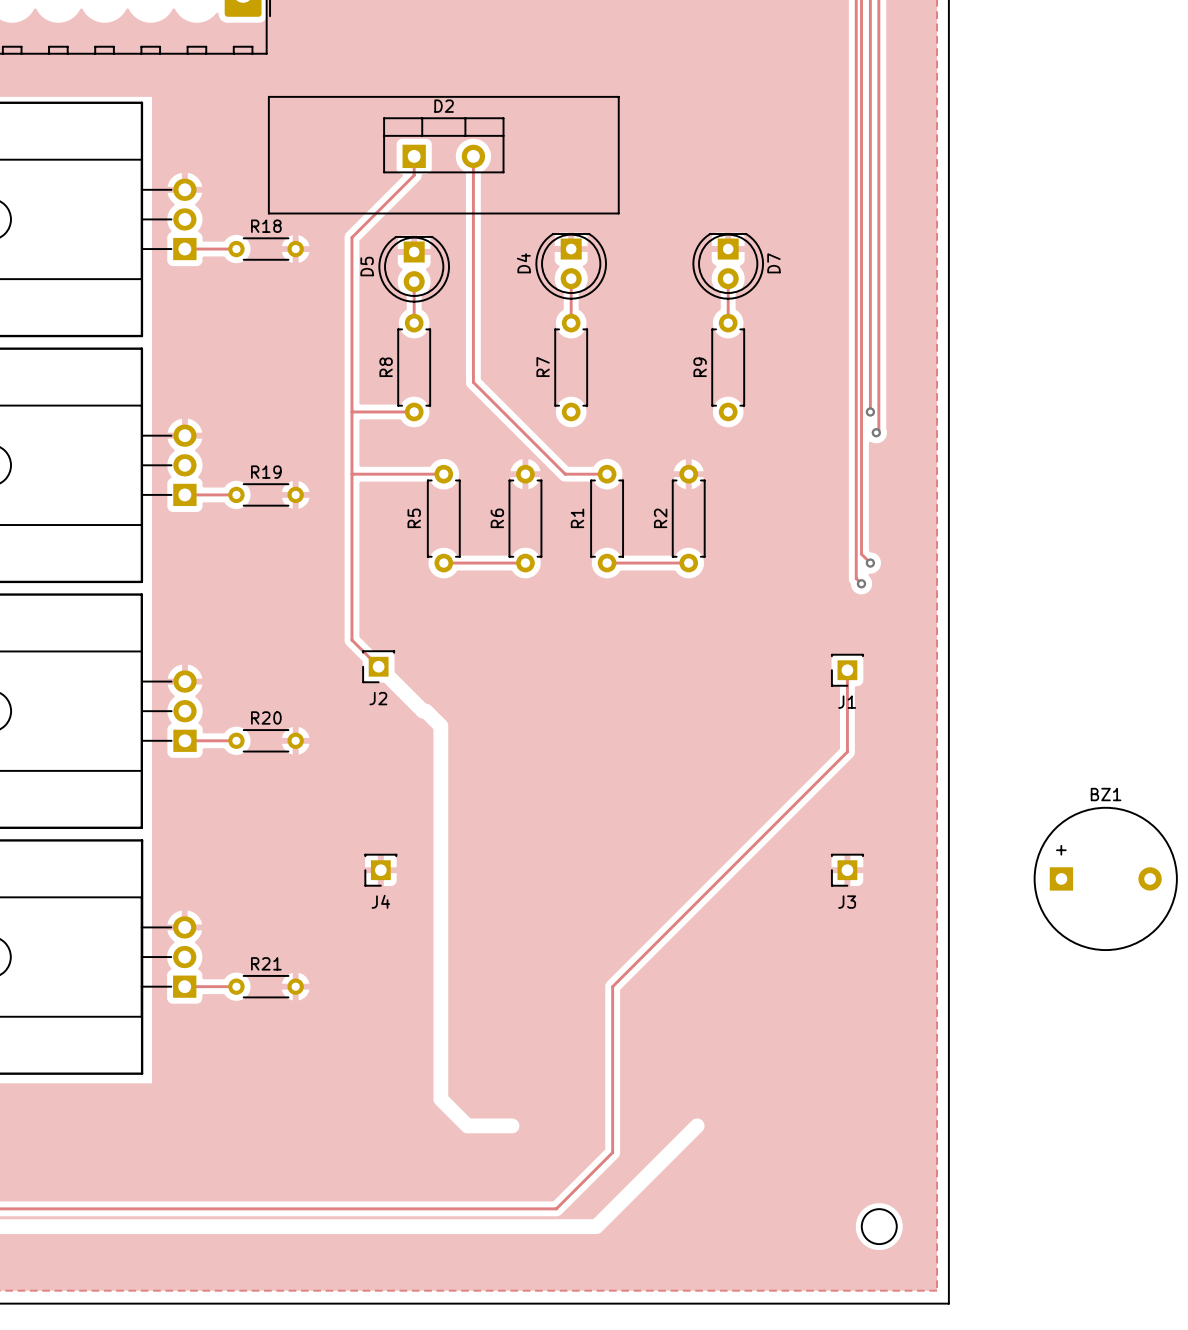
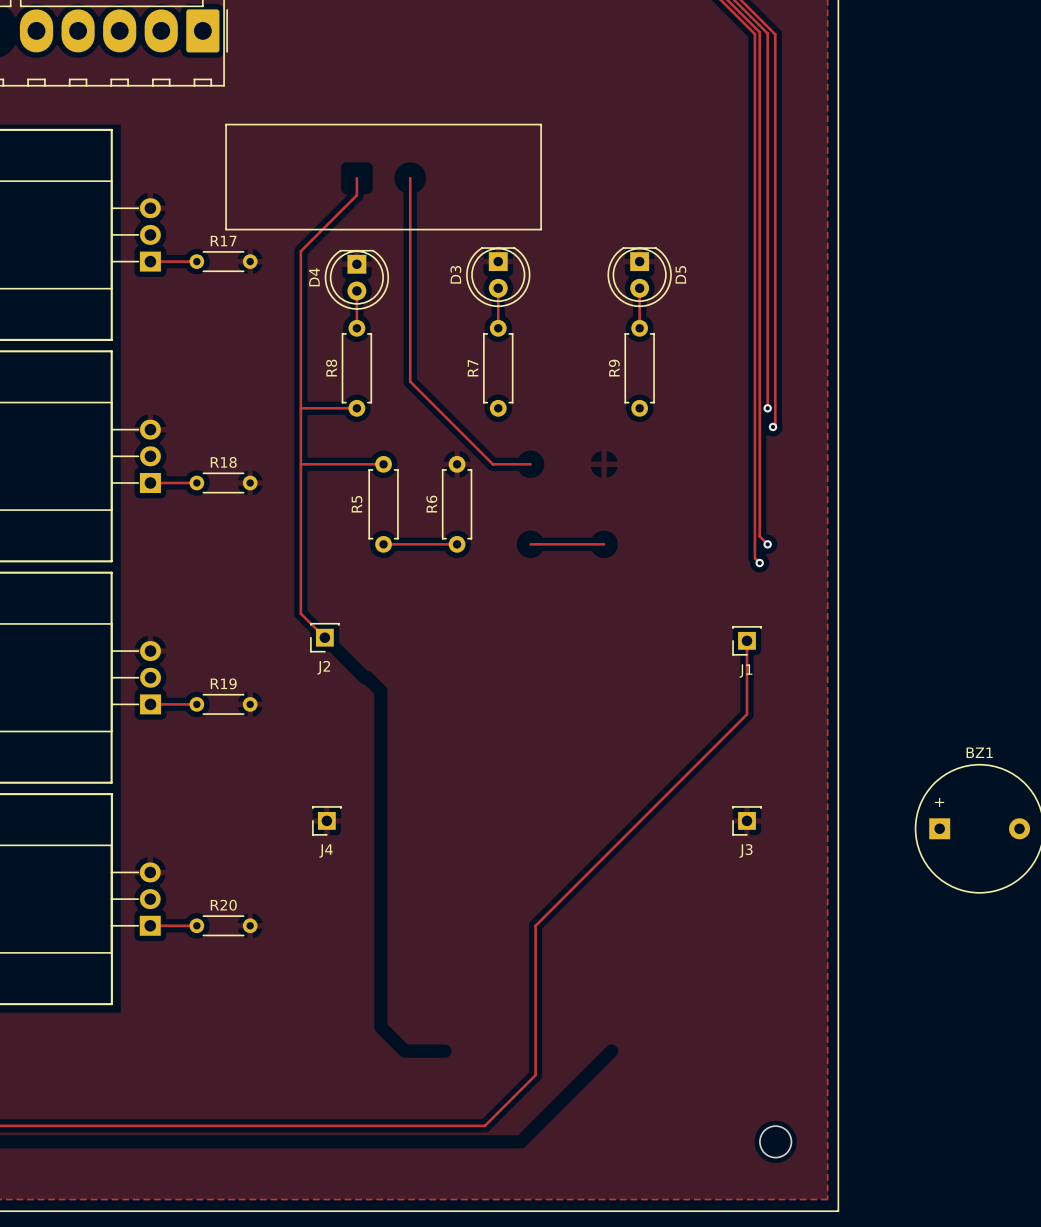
D2: (443, 145) -> none
R18 name: R18 (266, 226) -> R17 (223, 241)
D4 name: D4 (523, 263) -> D3 (455, 274)
D7 name: D7 (773, 263) -> D5 (680, 274)
D5 name: D5 (367, 266) -> D4 (314, 277)
R19 name: R19 (266, 472) -> R18 (223, 462)
R1: (607, 518) -> none
R2: (688, 518) -> none
R20 name: R20 (266, 717) -> R19 (223, 683)
R21 name: R21 (266, 963) -> R20 (223, 905)

